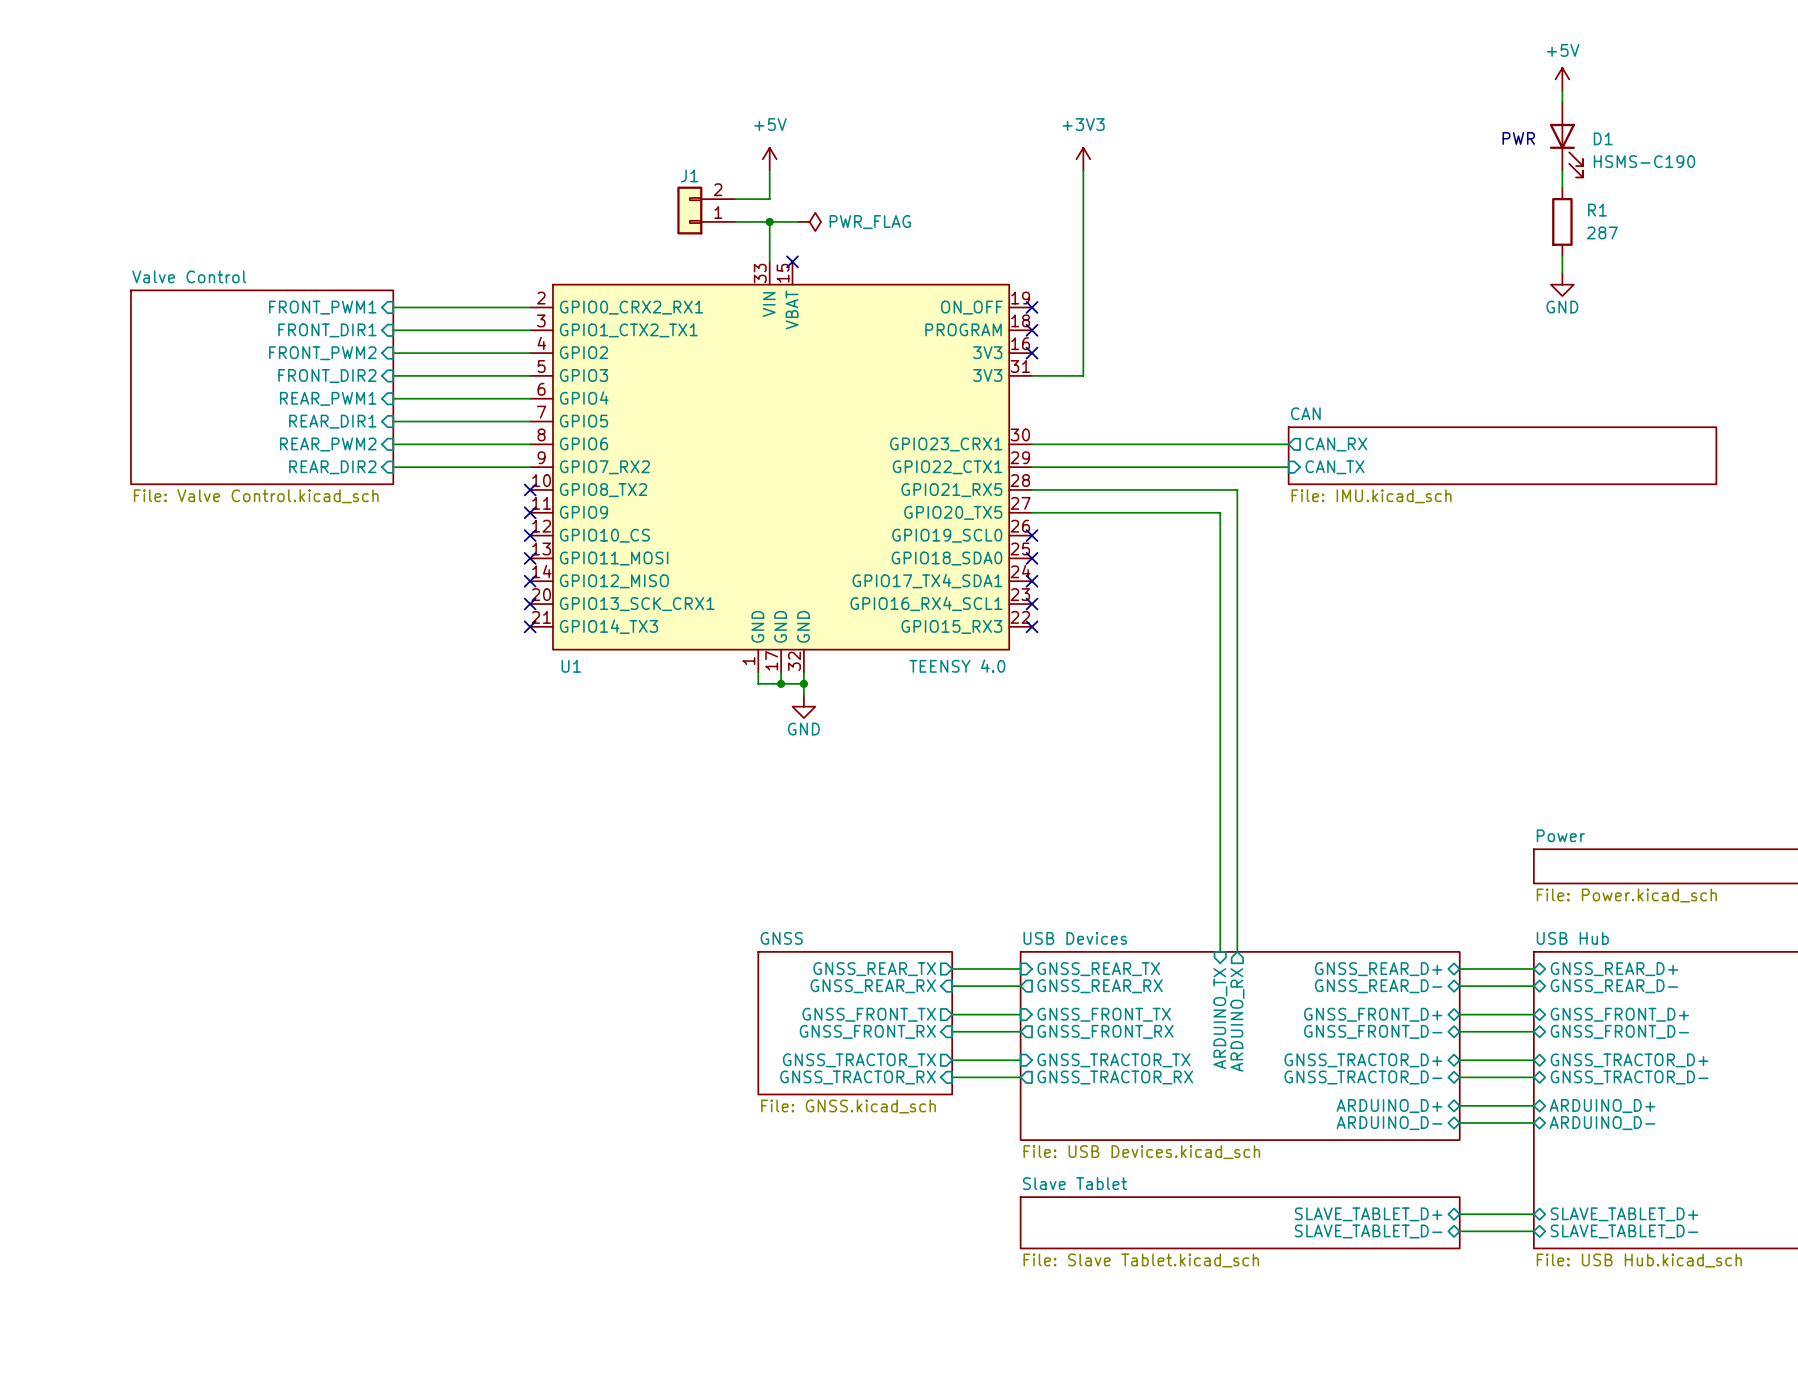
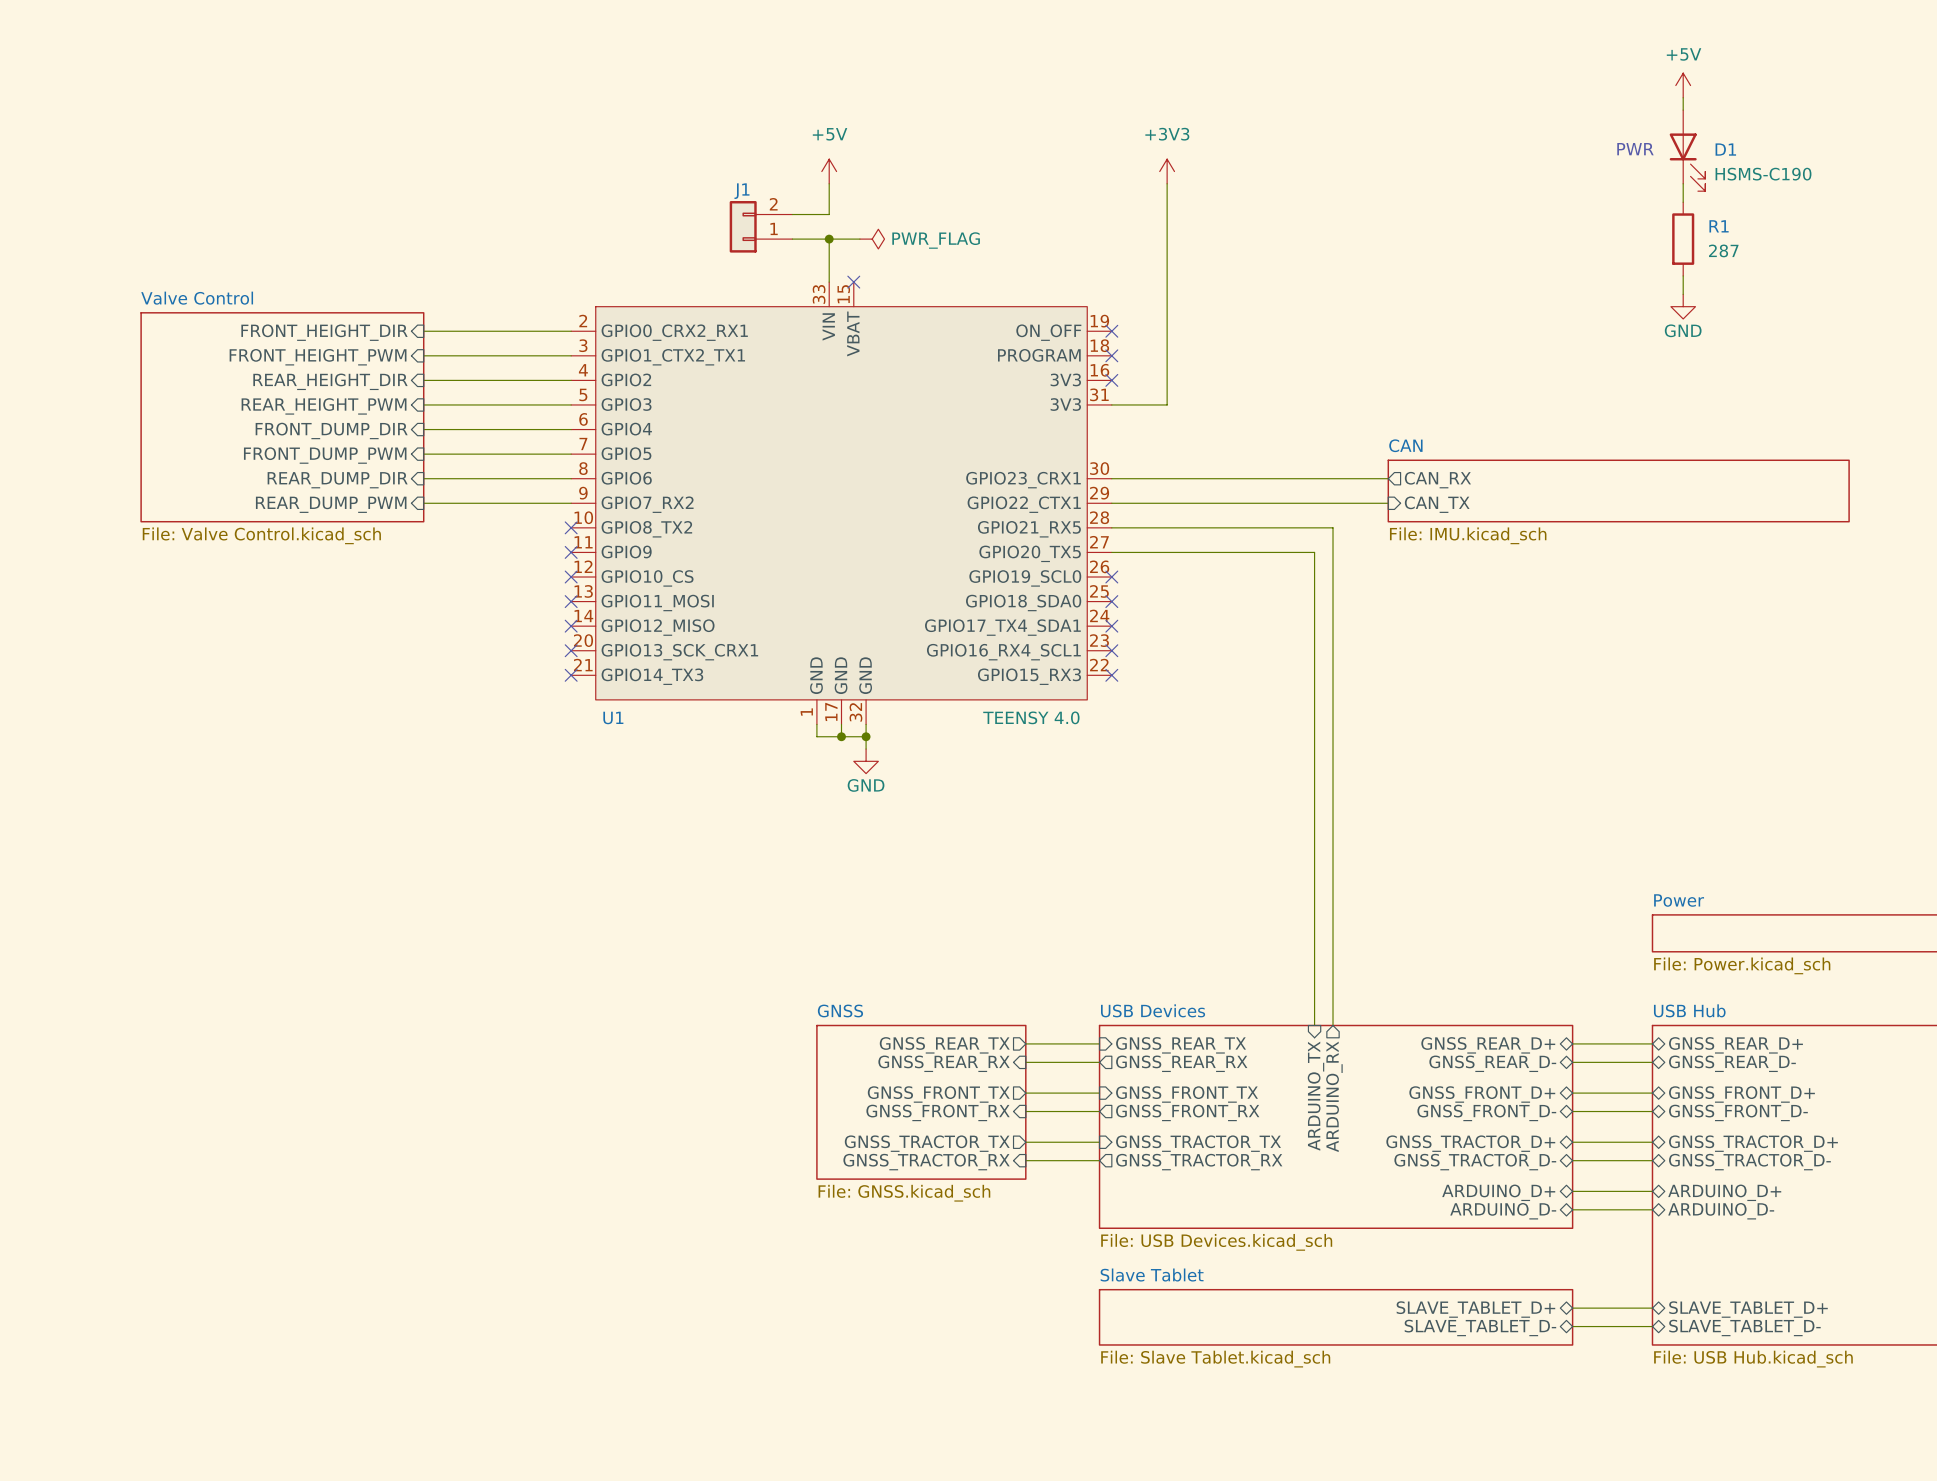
sheet pin: FRONT_PWM1 (322, 307) -> FRONT_HEIGHT_DIR (324, 332)
sheet pin: FRONT_DIR1 (327, 330) -> FRONT_HEIGHT_PWM (318, 357)
sheet pin: FRONT_PWM2 (322, 353) -> REAR_HEIGHT_DIR (330, 381)
sheet pin: FRONT_DIR2 (327, 376) -> REAR_HEIGHT_PWM (324, 406)
sheet pin: REAR_PWM1 (328, 398) -> FRONT_DUMP_DIR (331, 430)
sheet pin: REAR_DIR1 (332, 421) -> FRONT_DUMP_PWM (325, 455)
sheet pin: REAR_PWM2 (328, 444) -> REAR_DUMP_DIR (337, 480)
sheet pin: REAR_DIR2 (332, 467) -> REAR_DUMP_PWM (331, 504)

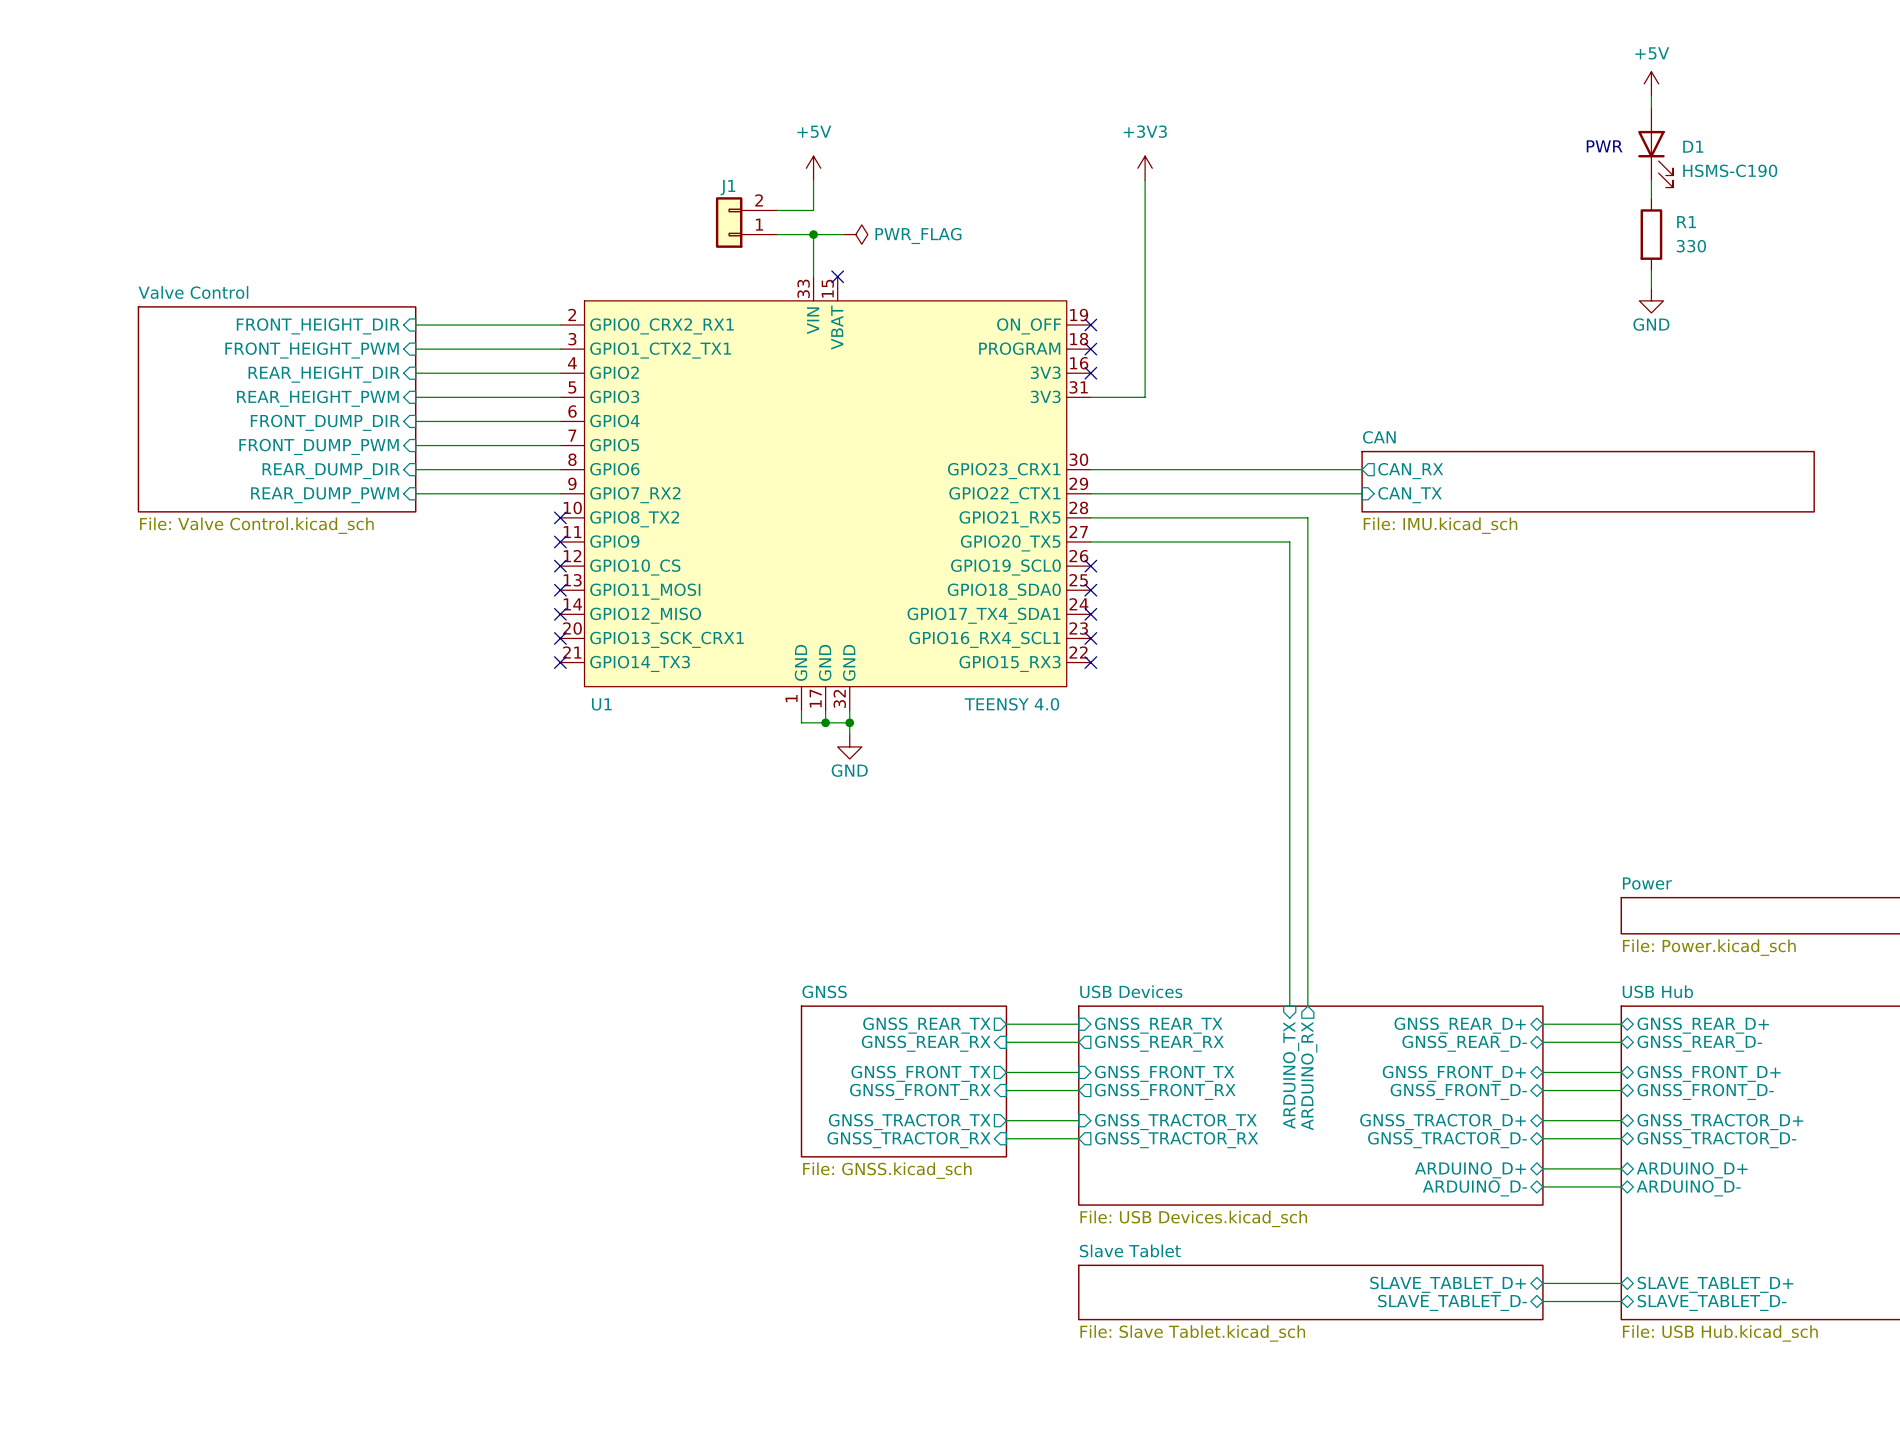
R1 value: 287 (1723, 250) -> 330 (1691, 246)

